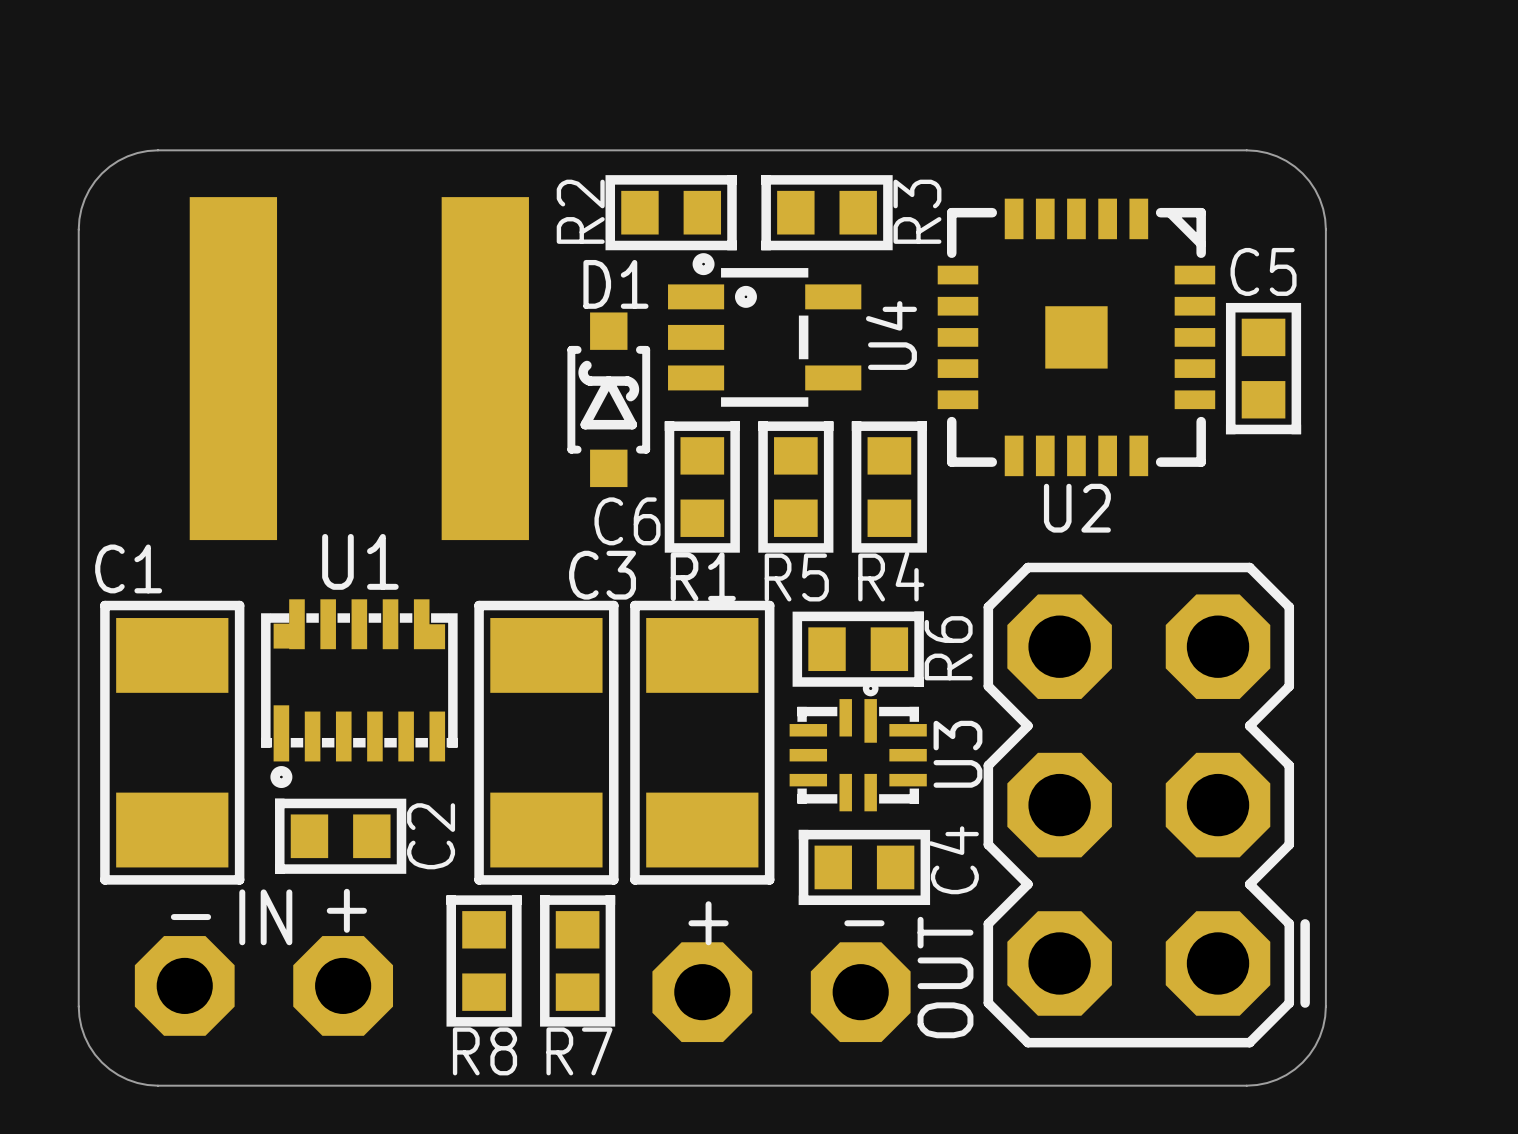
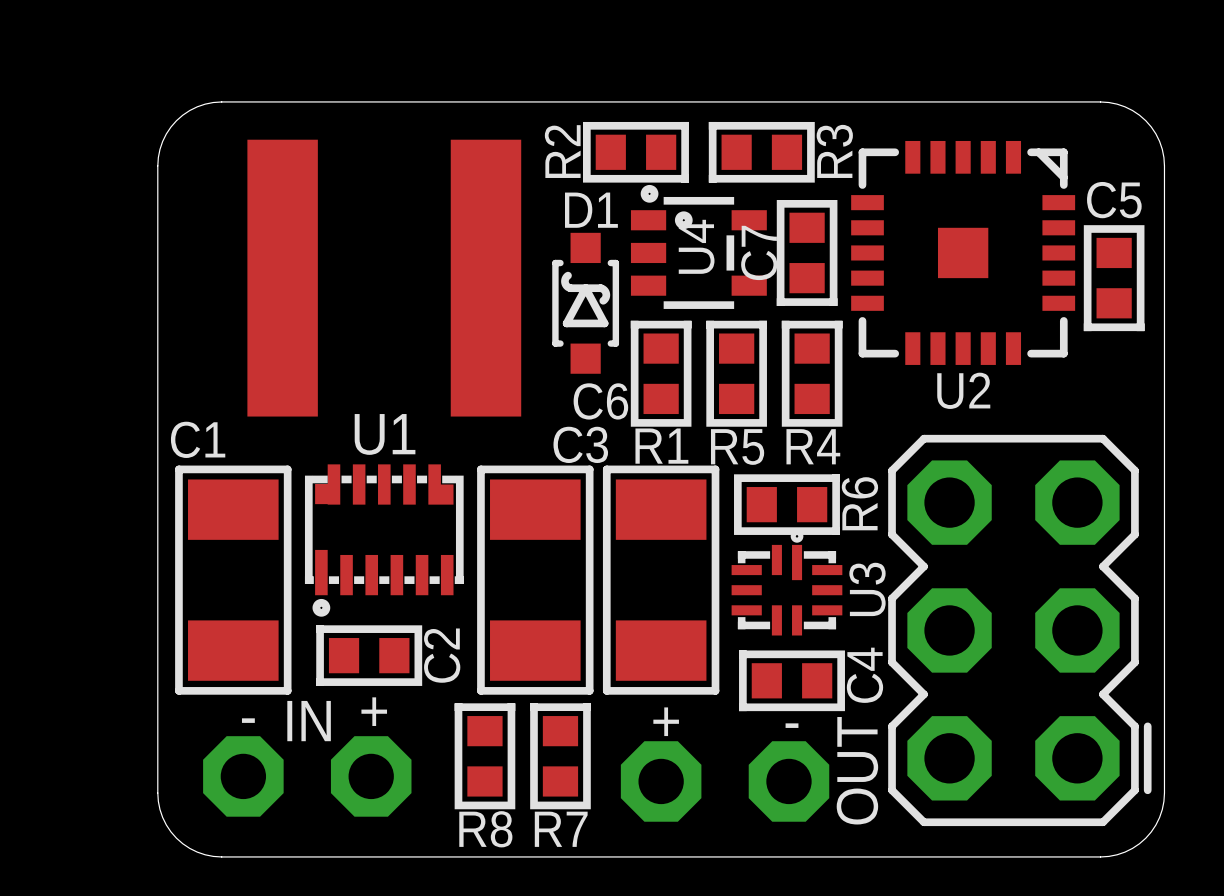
U4 footprint: [668, 253, 862, 407] -> [630, 184, 767, 309]
U4 name position: U4 (891, 335) -> U4 (696, 246)
C7: none -> (807, 252)

